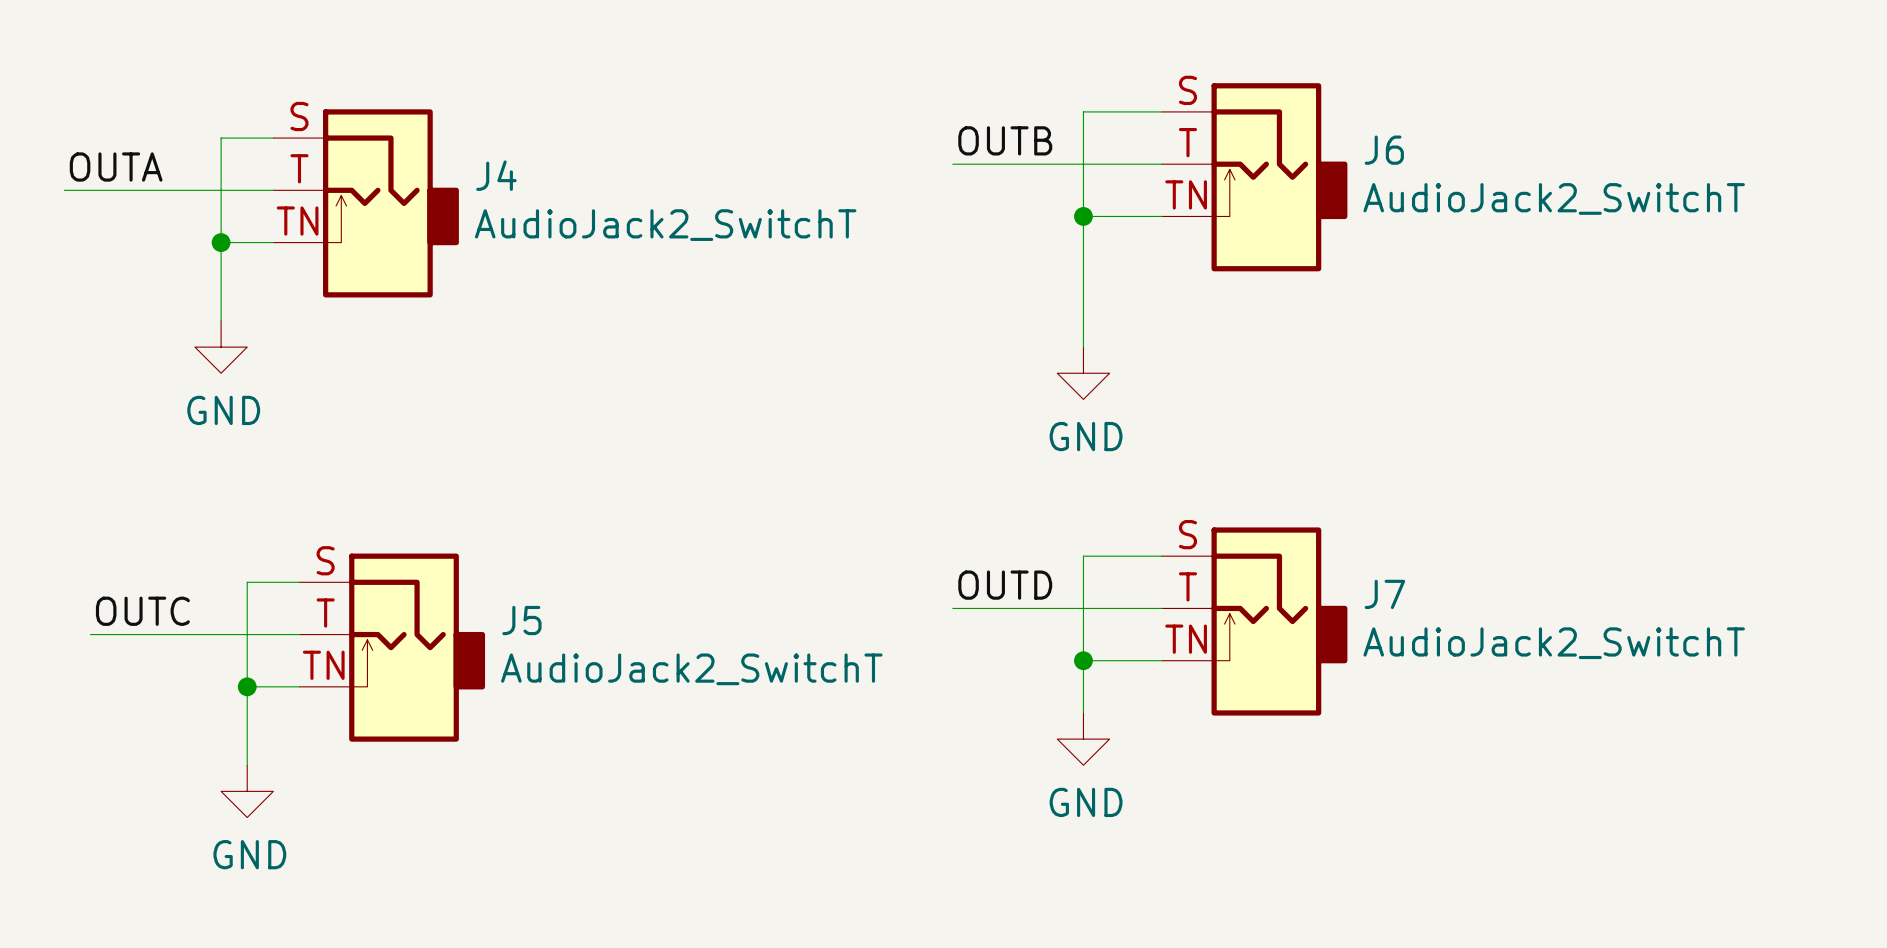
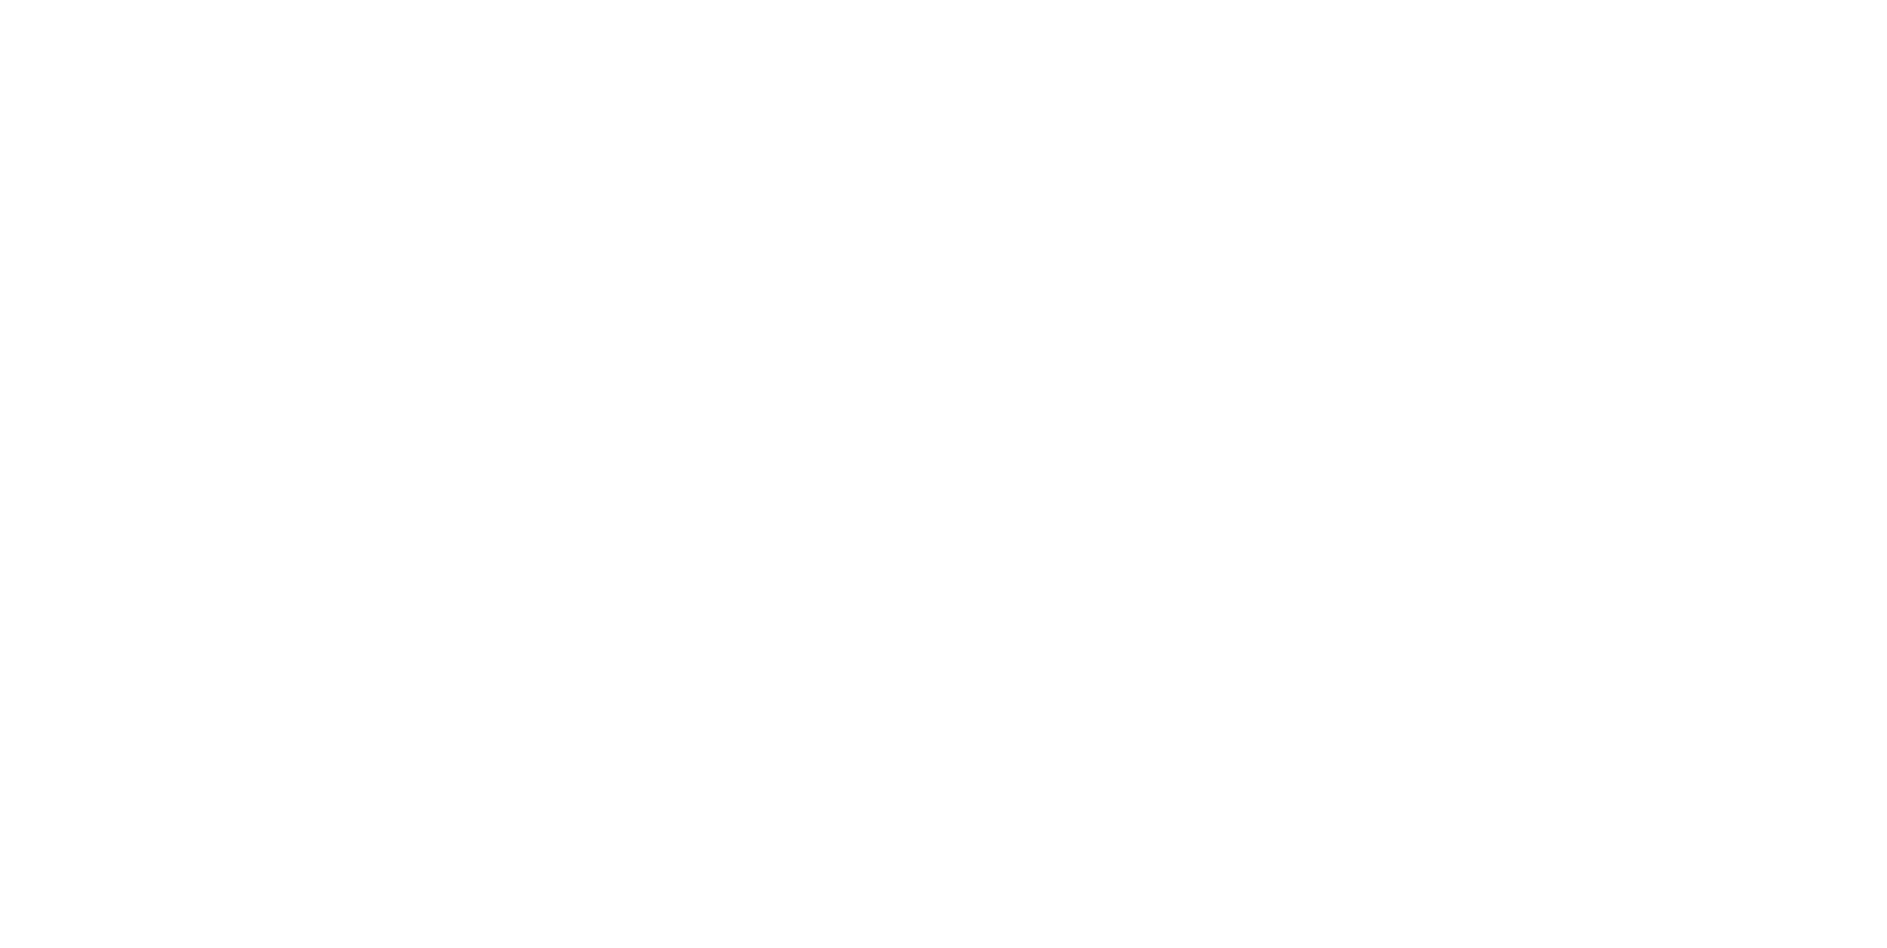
wire: (1161, 111) (1083, 111) (1083, 347) -> none
wire: (273, 138) (221, 138) (221, 320) -> none
label: OUTB (1005, 140) -> none
wire: (952, 164) (1161, 164) -> none
label: OUTA (116, 167) -> none
J6: AudioJack2_SwitchT (1254, 177) -> none
wire: (64, 190) (273, 190) -> none
J4: AudioJack2_SwitchT (366, 203) -> none
wire: (1083, 216) (1161, 216) -> none
junction: (1083, 216) -> none
wire: (221, 242) (273, 242) -> none
junction: (221, 242) -> none
power symbol: GND (221, 347) -> none
power symbol: GND (1083, 373) -> none
wire: (1161, 556) (1083, 556) (1083, 712) -> none
wire: (299, 582) (247, 582) (247, 765) -> none
label: OUTD (1005, 585) -> none
wire: (952, 608) (1161, 608) -> none
label: OUTC (142, 611) -> none
J7: AudioJack2_SwitchT (1254, 621) -> none
wire: (90, 634) (299, 634) -> none
J5: AudioJack2_SwitchT (392, 647) -> none
wire: (1083, 660) (1161, 660) -> none
junction: (1083, 660) -> none
wire: (247, 686) (299, 686) -> none
junction: (247, 686) -> none
power symbol: GND (1083, 739) -> none
power symbol: GND (247, 791) -> none

